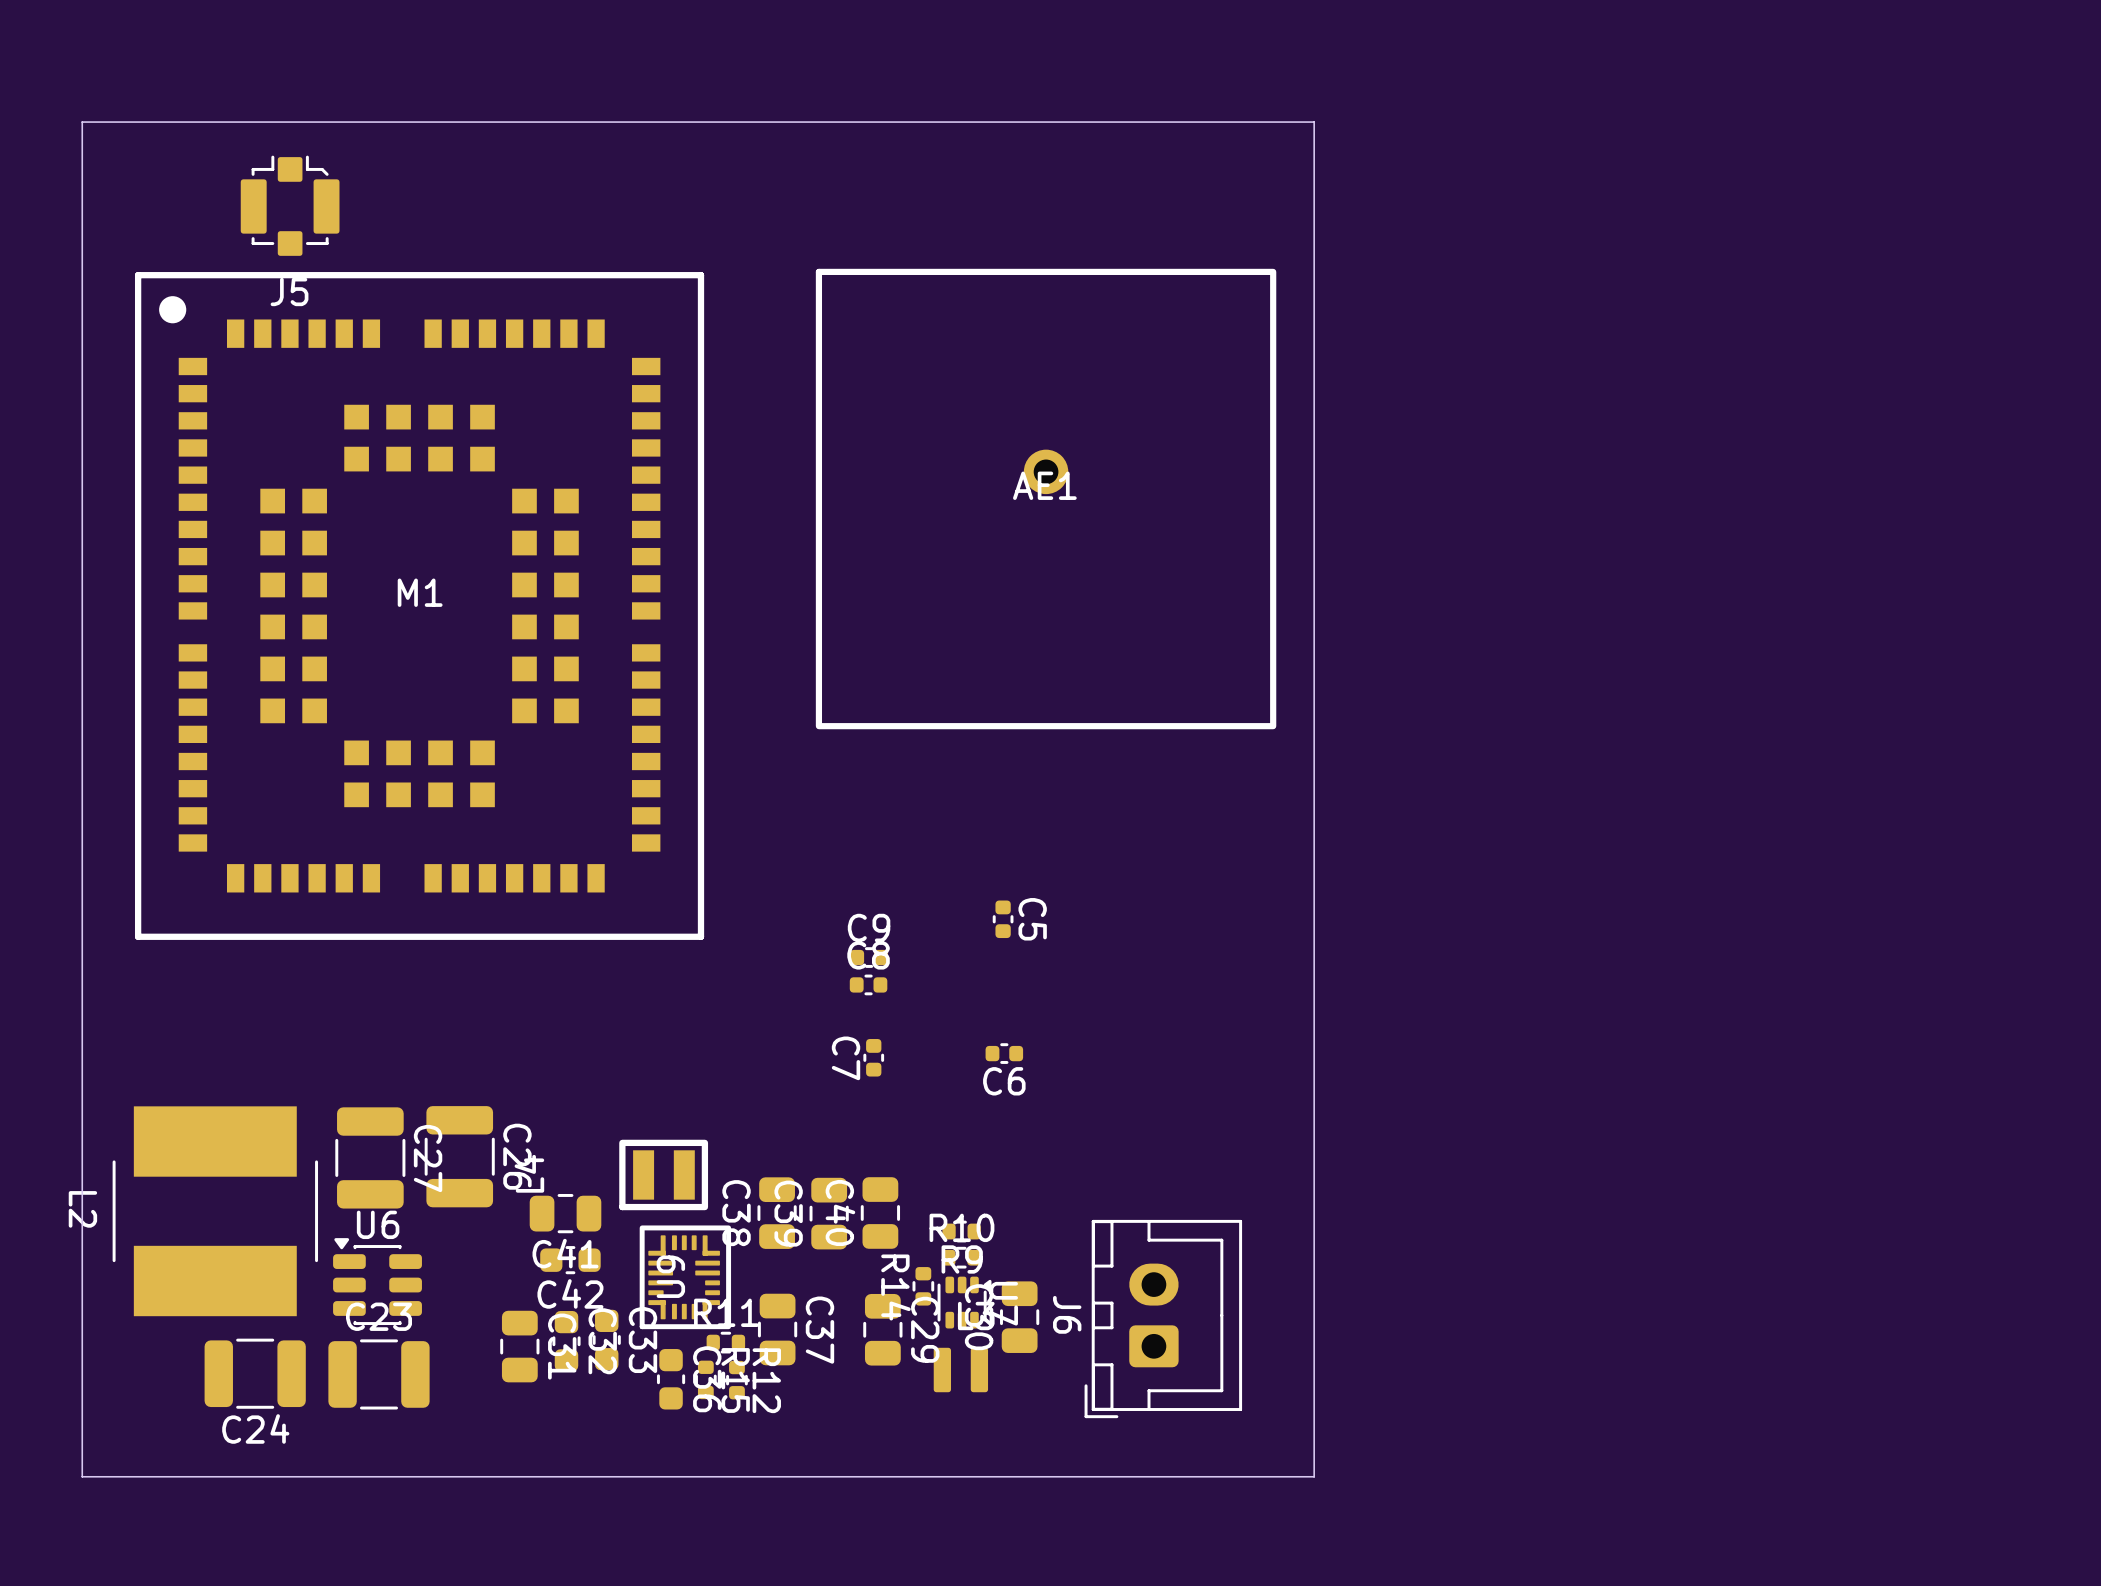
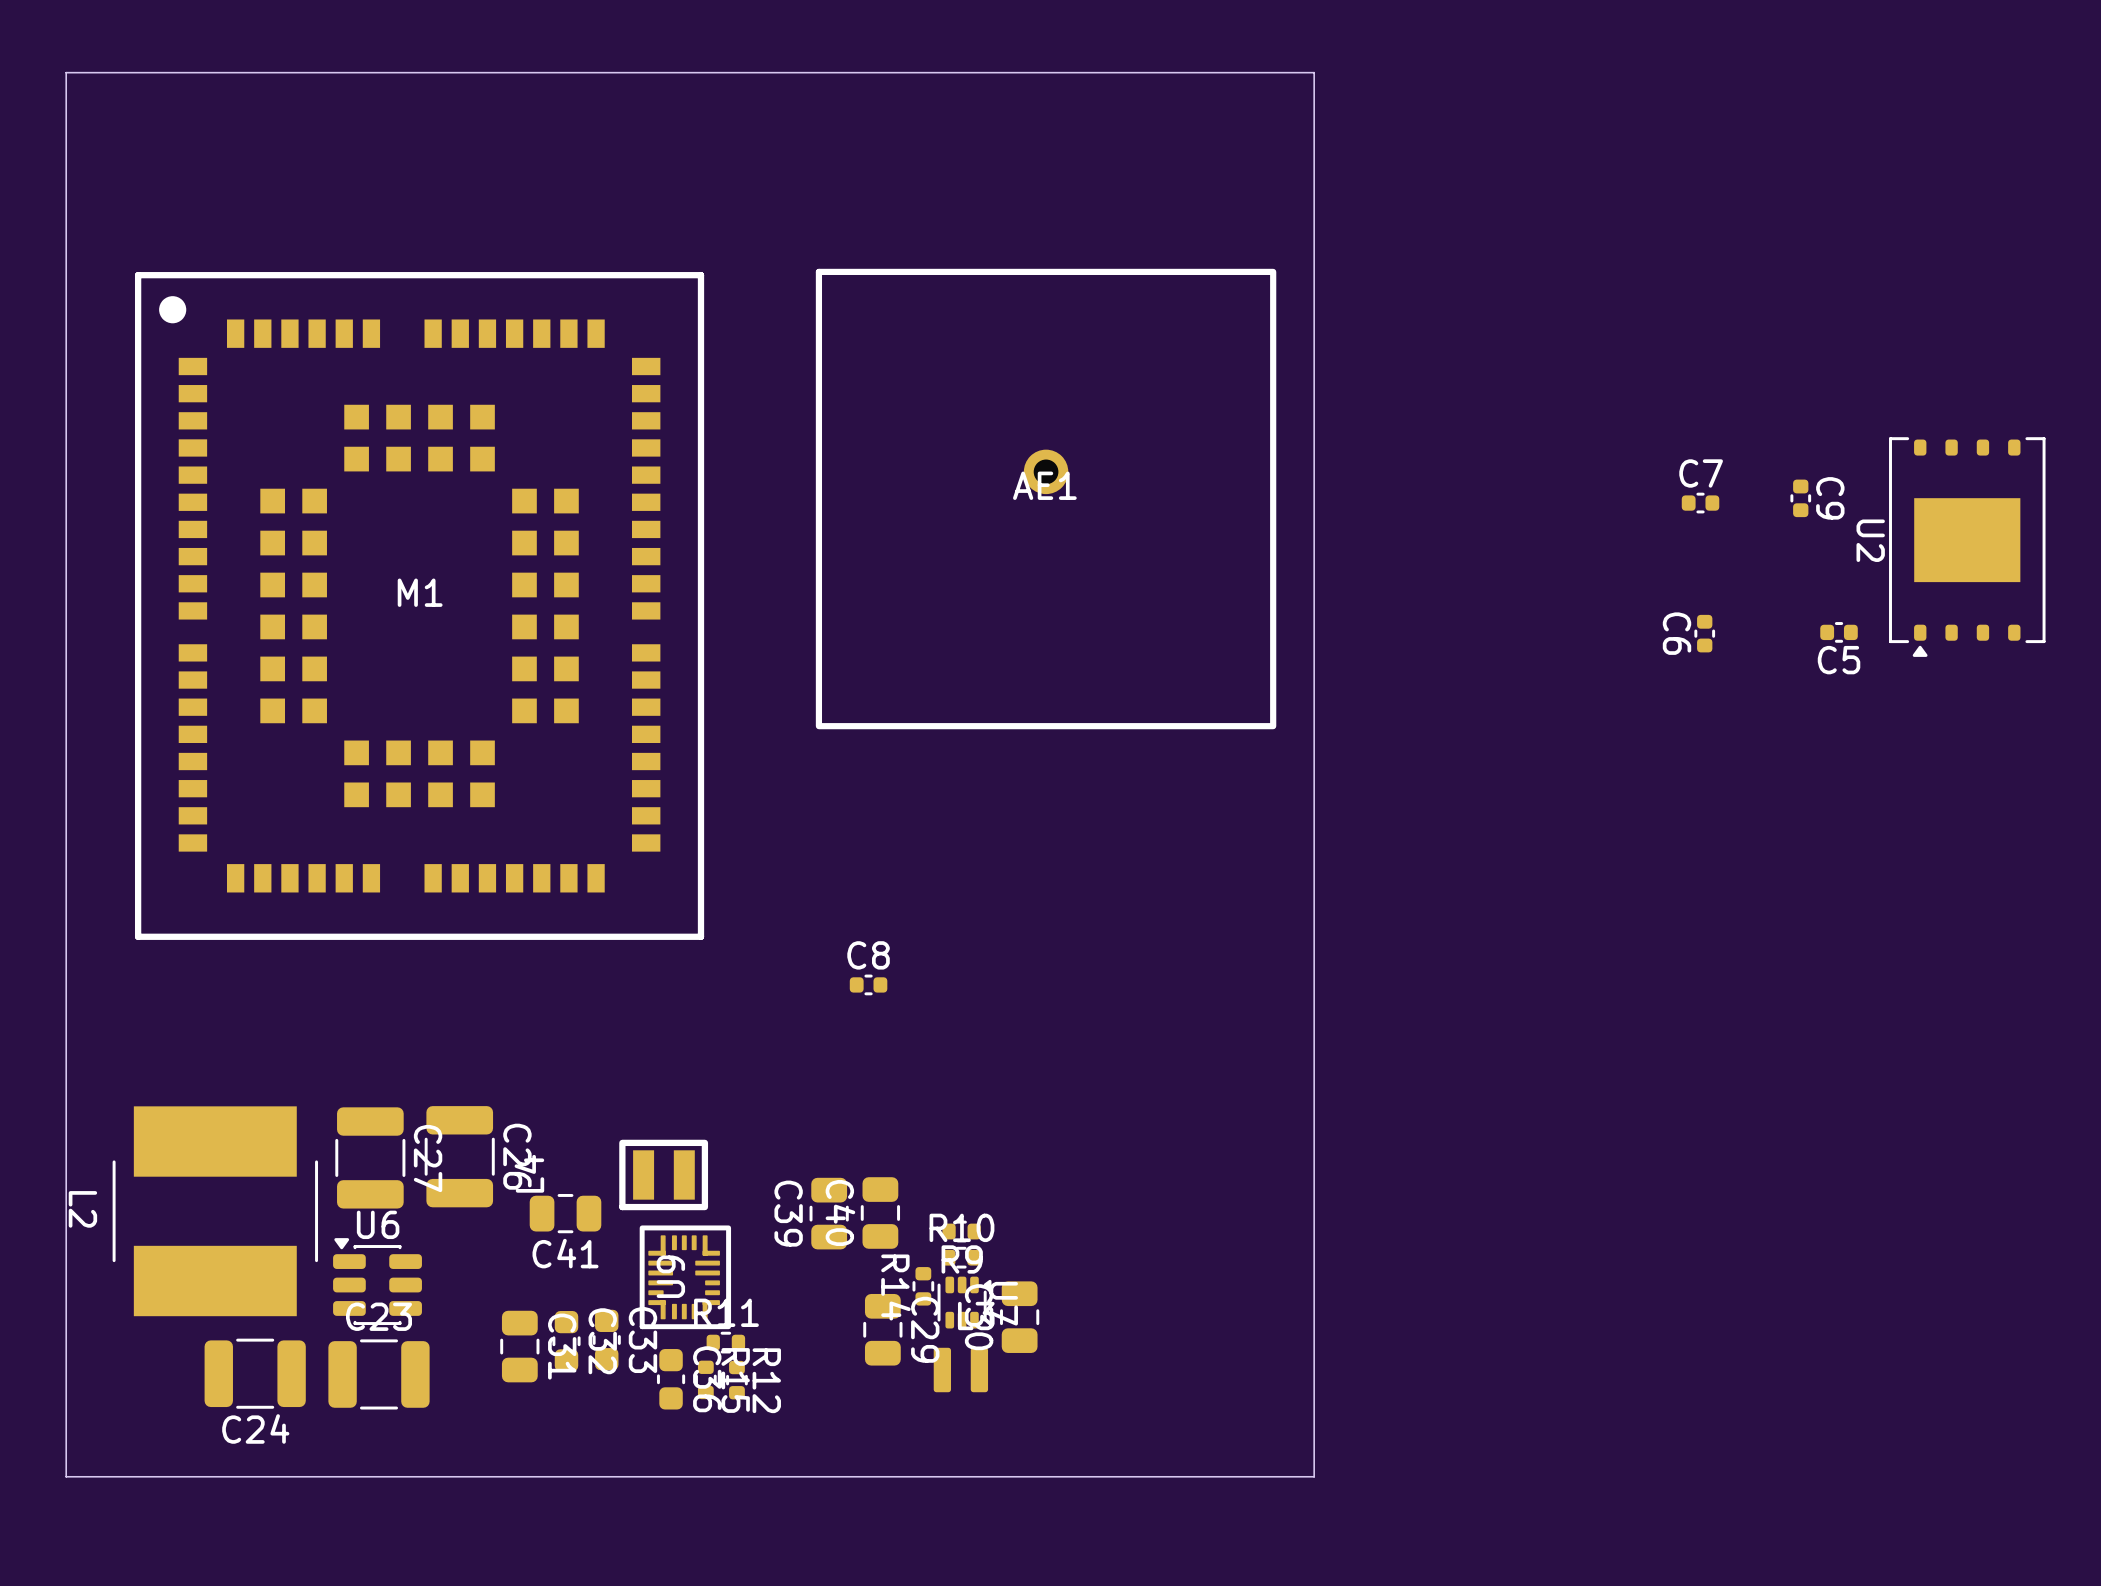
board edge: (1314, 122) (82, 122) (82, 1476) -> (1314, 122) (1314, 72) (66, 72) (66, 1476) (82, 1476)
J5: (290, 205) -> none
U2: none -> (1967, 547)
C5 rotation: 0° (1003, 919) -> 90° clockwise (1839, 632)
C5 position: (1003, 919) -> (1839, 632)
C9 rotation: 0° (869, 957) -> 90° clockwise (1800, 498)
C9 position: (869, 957) -> (1800, 498)
C6 rotation: 0° (1004, 1053) -> 90° clockwise (1704, 633)
C6 position: (1004, 1053) -> (1704, 633)
C7 rotation: 0° (873, 1057) -> 90° clockwise (1700, 503)
C7 position: (873, 1057) -> (1700, 503)
C38: (777, 1213) -> none
C42: (570, 1260) -> none
J6: (1163, 1319) -> none
C37: (777, 1329) -> none

